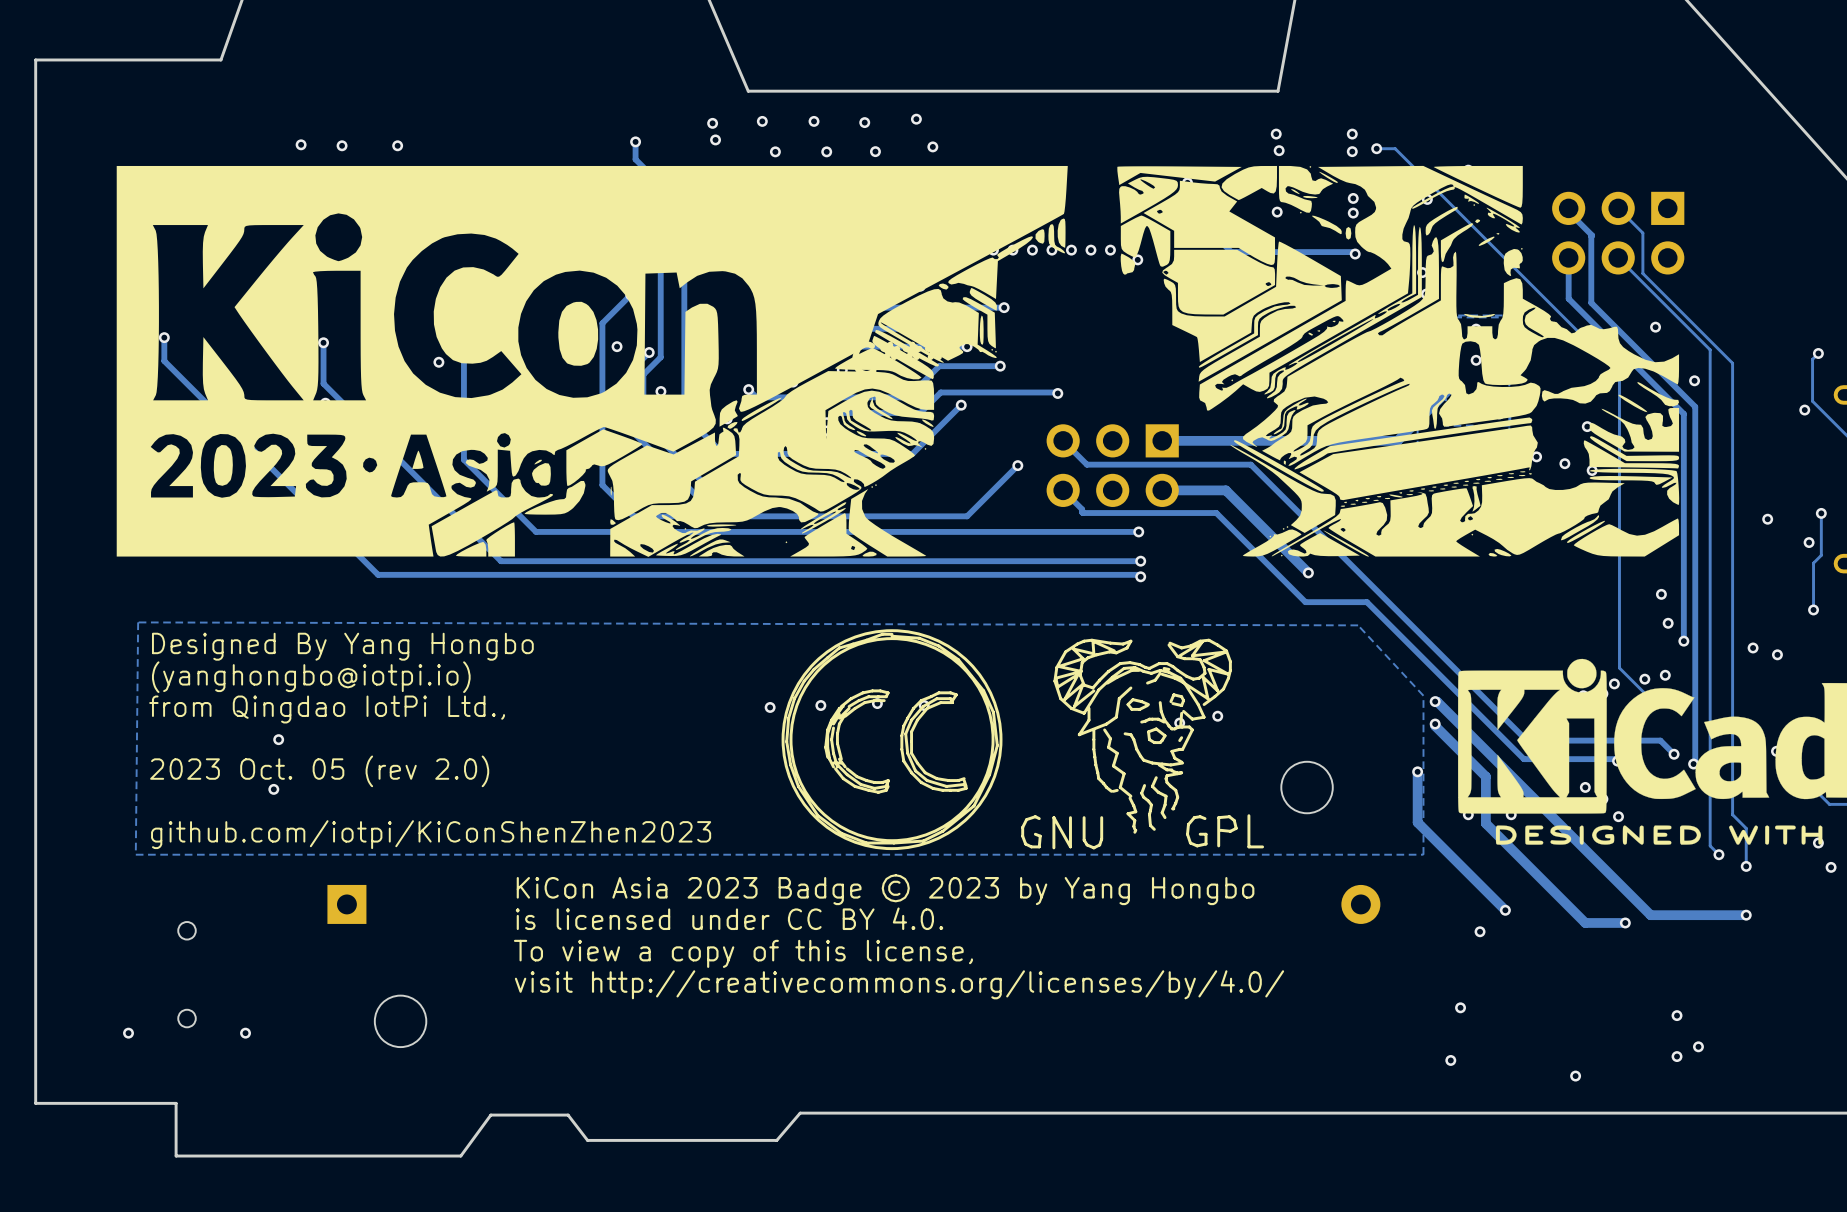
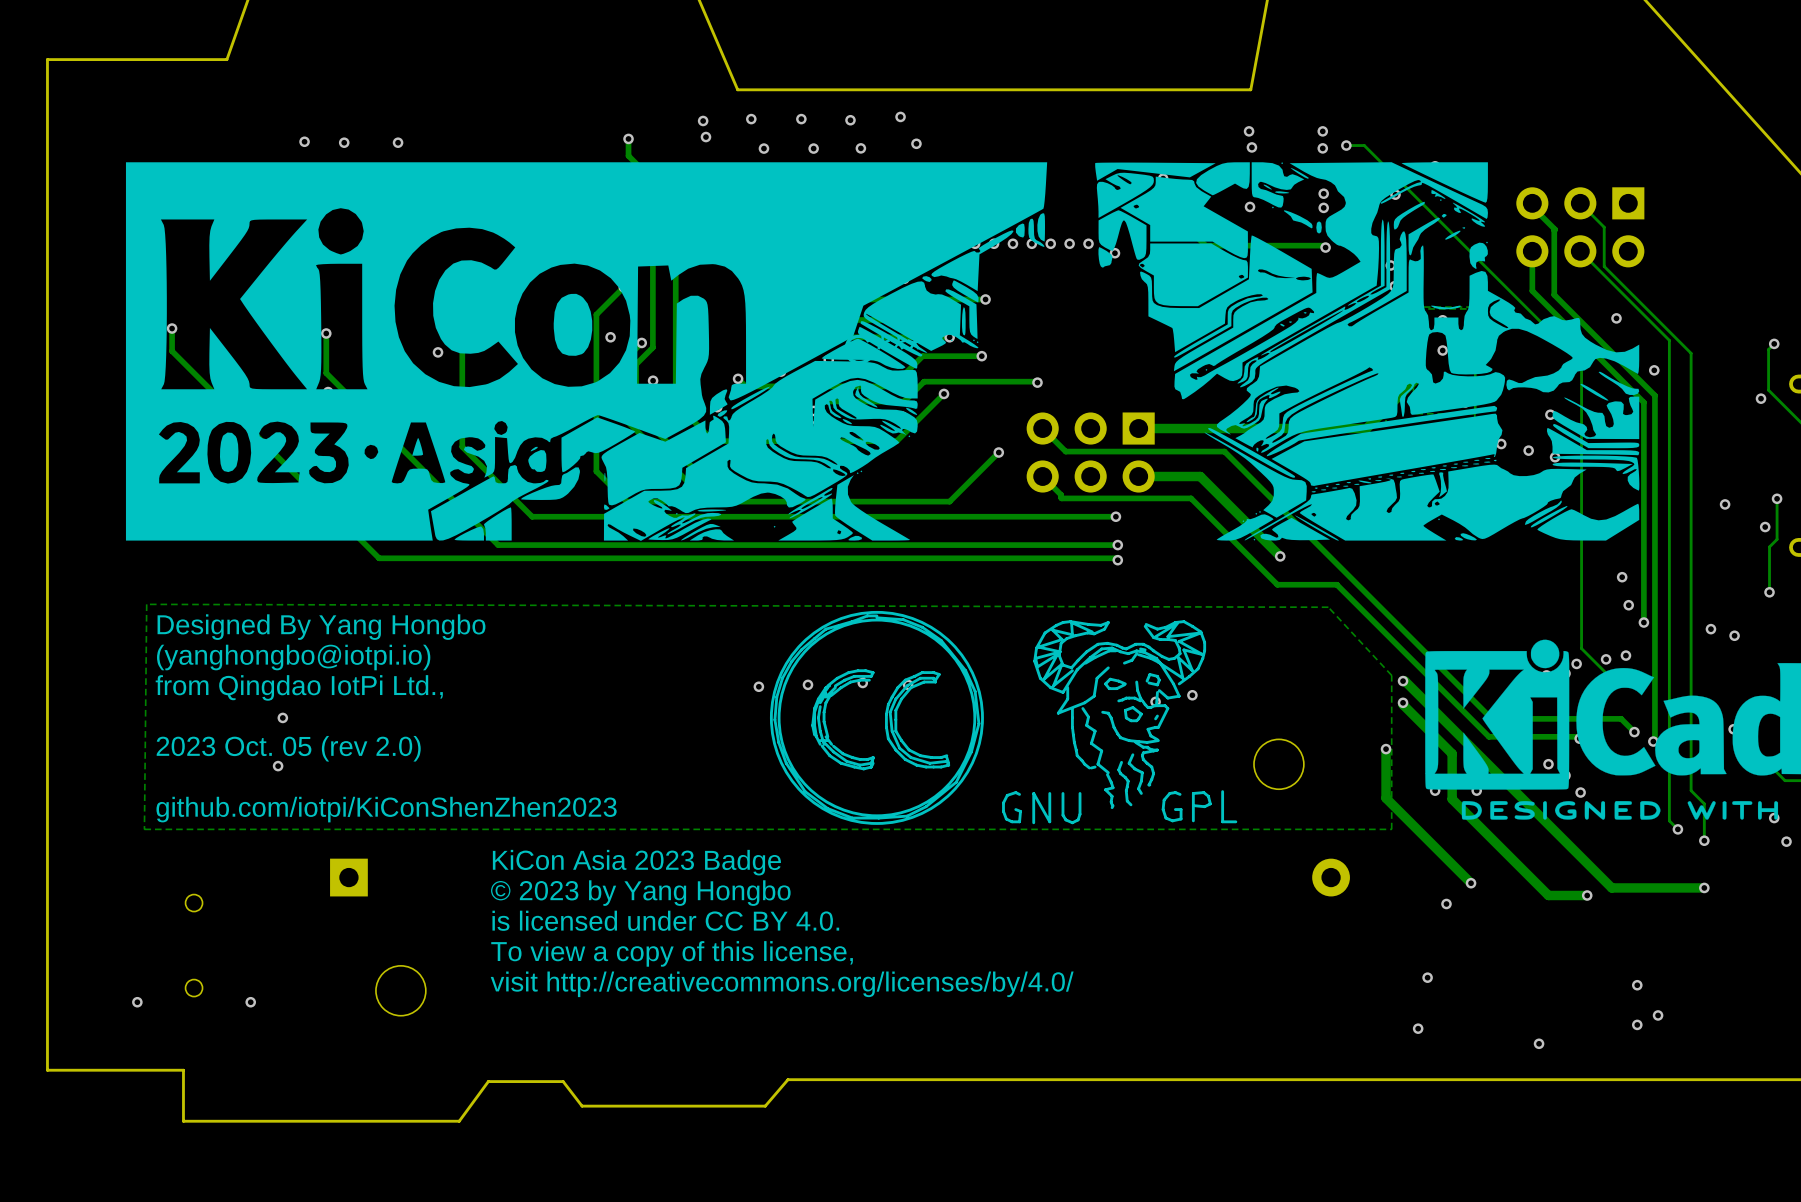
text: none -> KiCon Asia 2023 Badge (636, 862)
text: KiCon Asia 2023 Badge © 2023 by Yang Hongbo (885, 889) -> none
text position: is licensed under CC BY 4.0. (729, 918) -> is licensed under CC BY 4.0. (665, 920)
text: none -> © 2023 by Yang Hongbo (640, 893)
text position: To view a copy of this license, (743, 953) -> To view a copy of this license, (672, 953)
text position: visit http://creativecommons.org/licenses/by/4.0/ (899, 984) -> visit http://creativecommons.org/licenses/by/4.0/ (782, 984)

